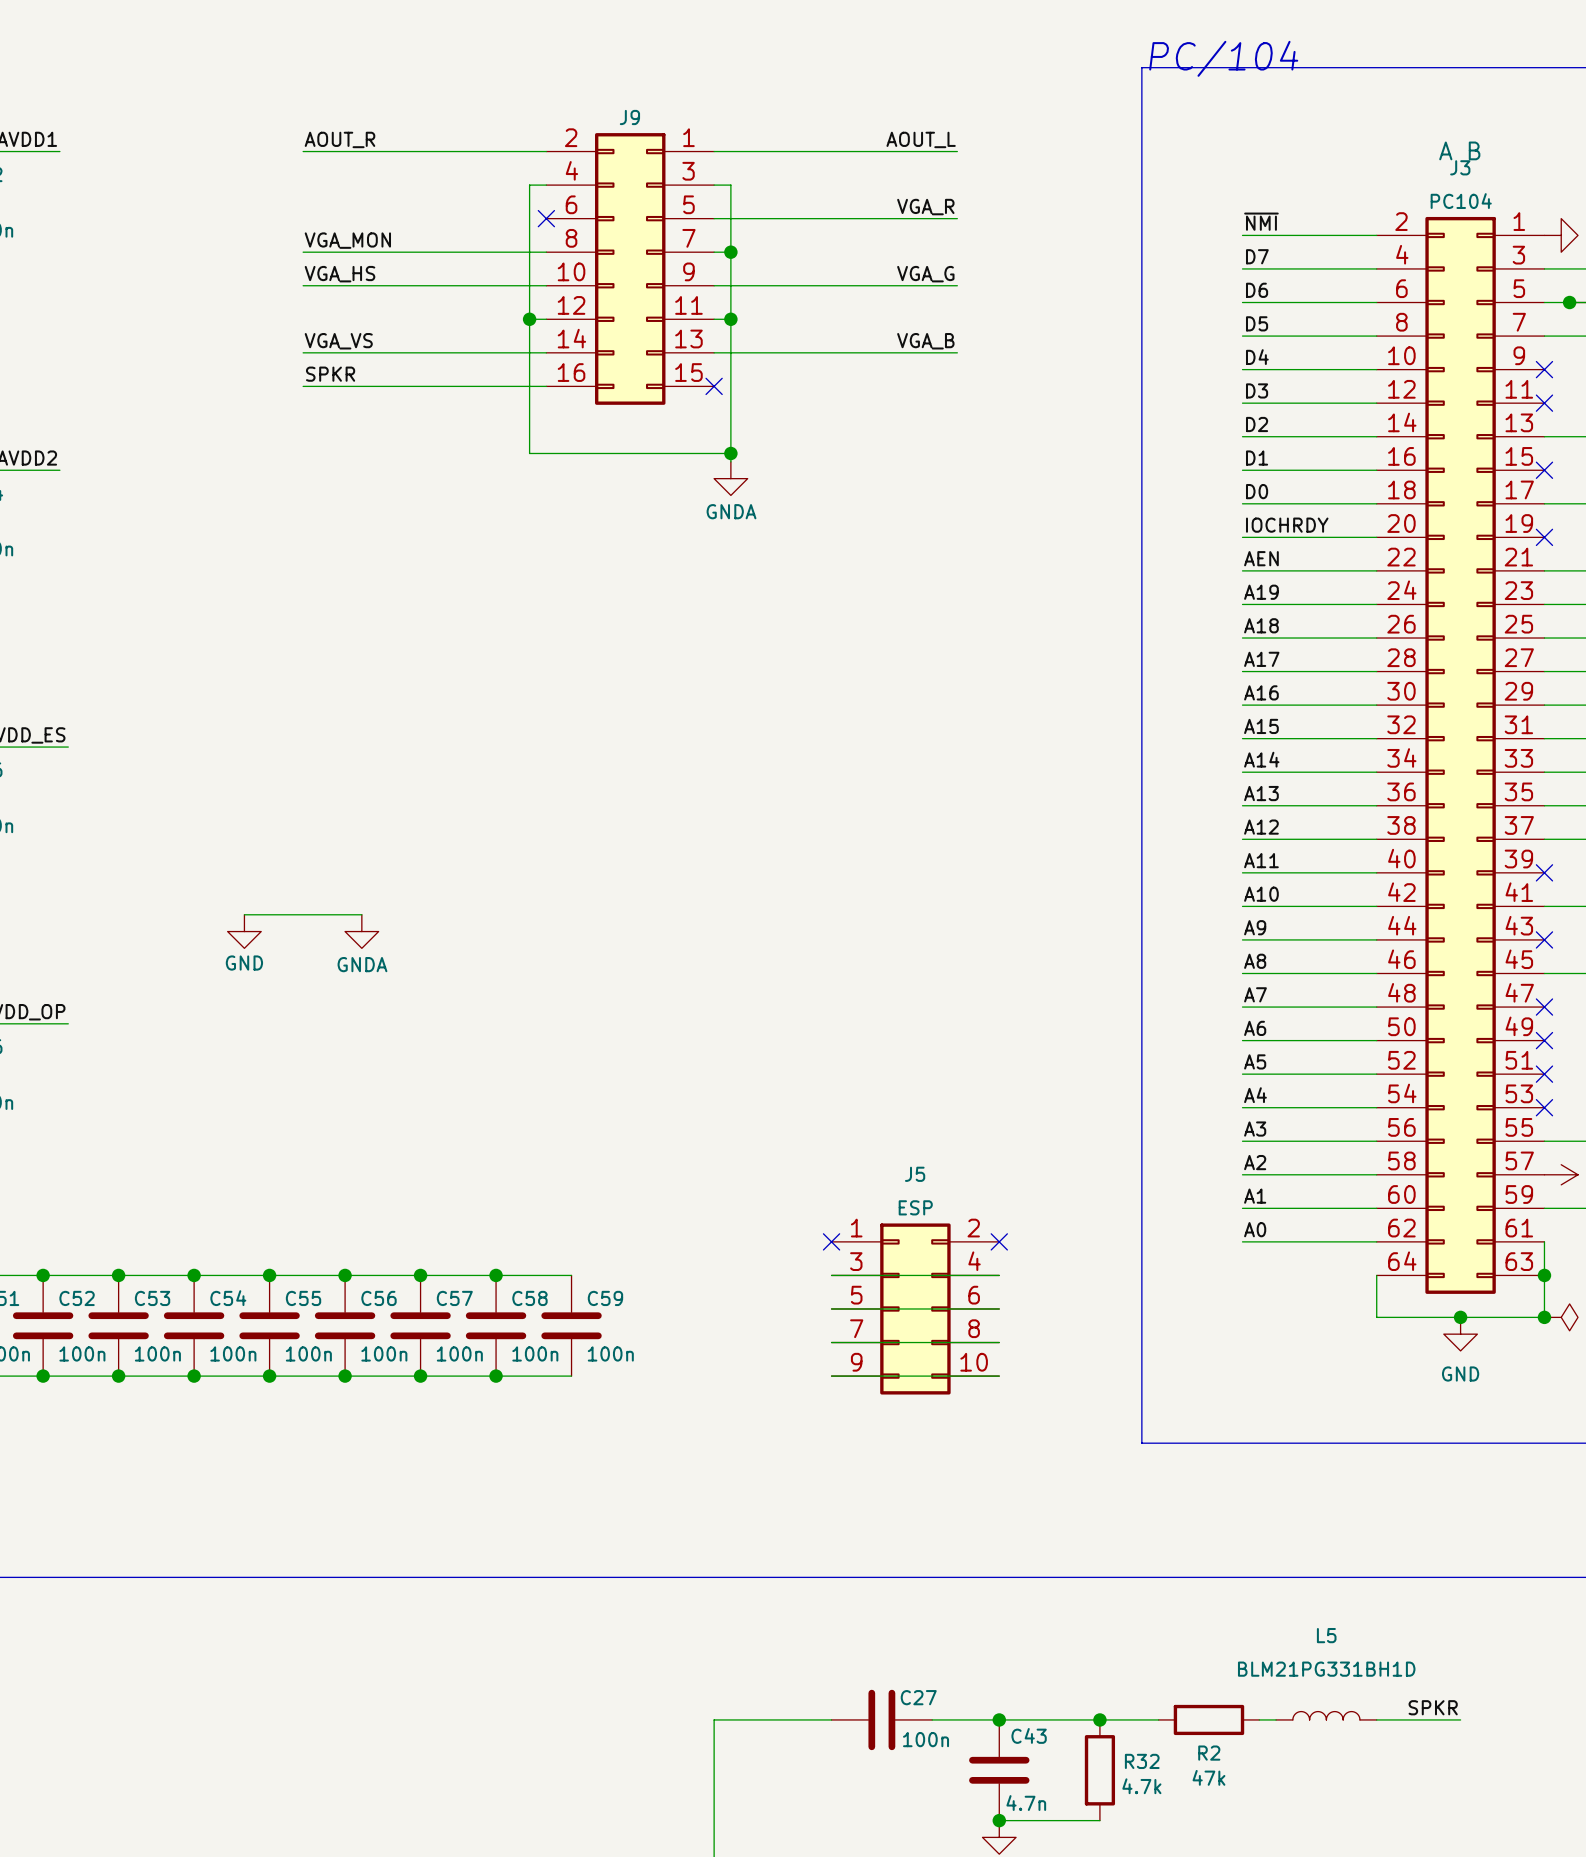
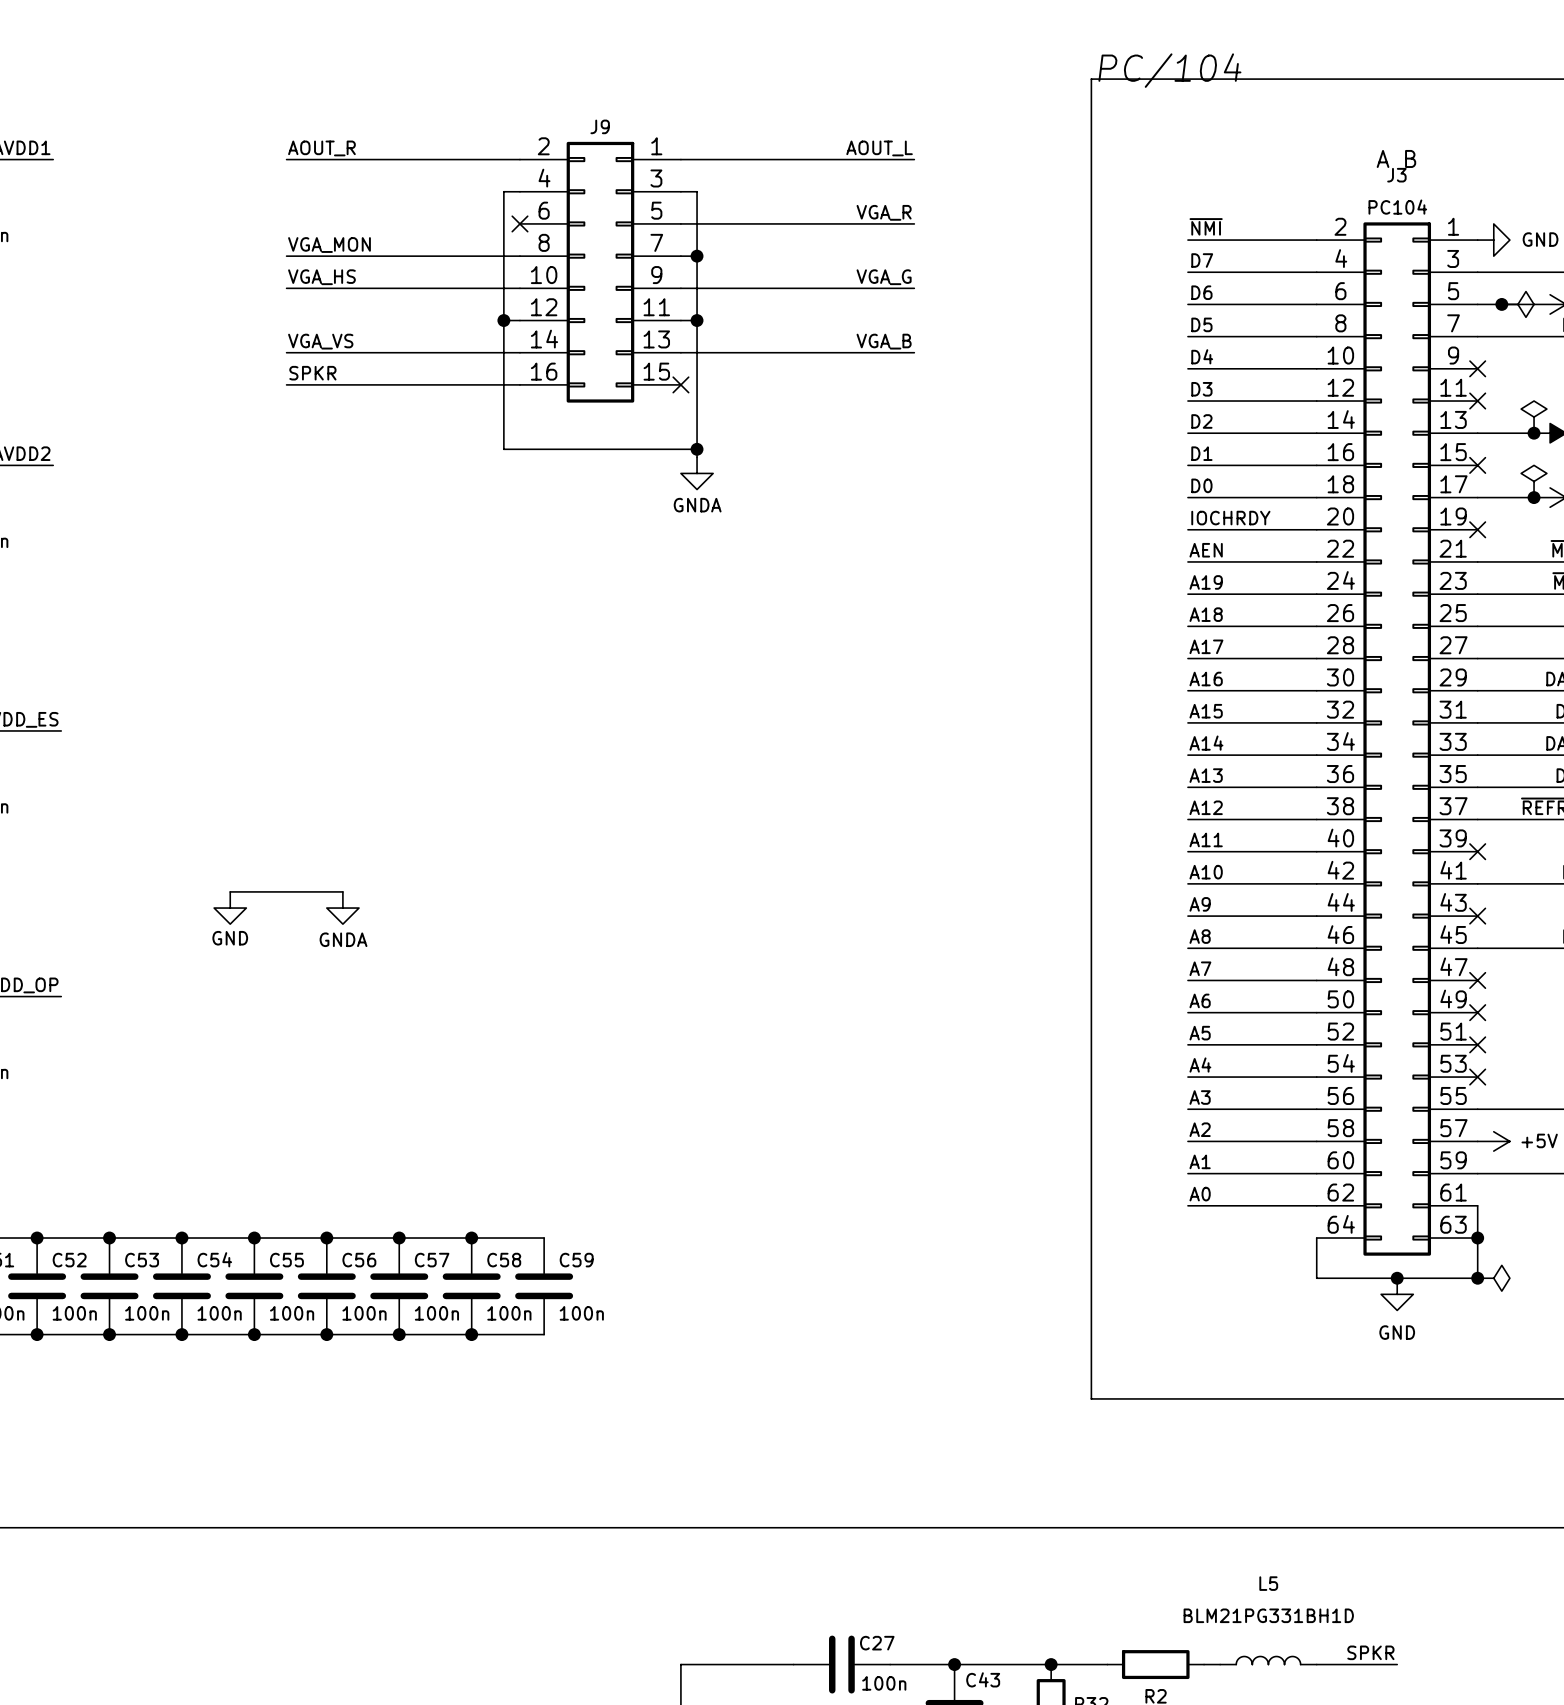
no-connect mark: (831, 1241) -> none
no-connect mark: (999, 1241) -> none
wire: (831, 1275) (999, 1275) -> none
wire: (831, 1308) (999, 1308) -> none
J5: ESP (915, 1308) -> none
wire: (831, 1342) (999, 1342) -> none
wire: (831, 1376) (999, 1376) -> none

